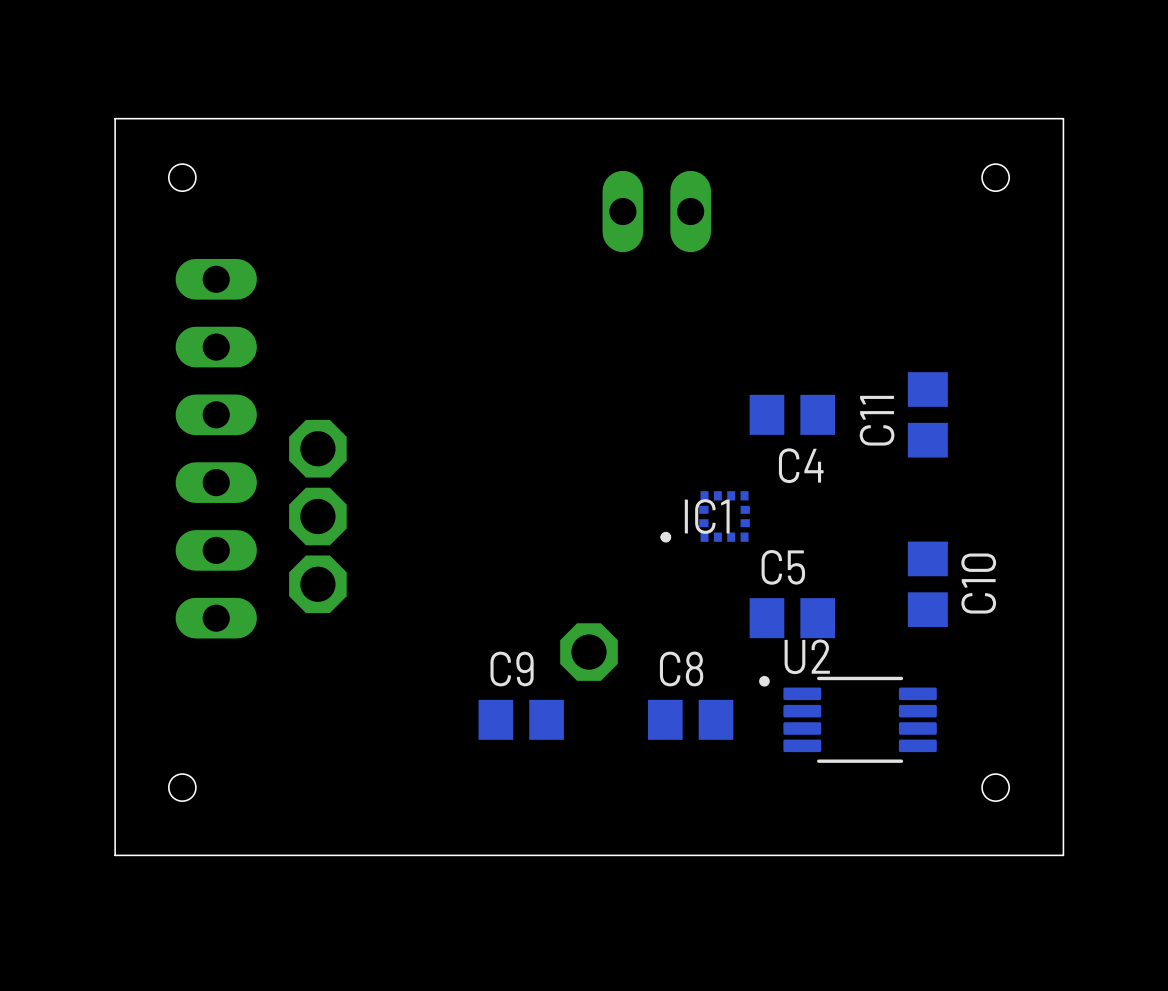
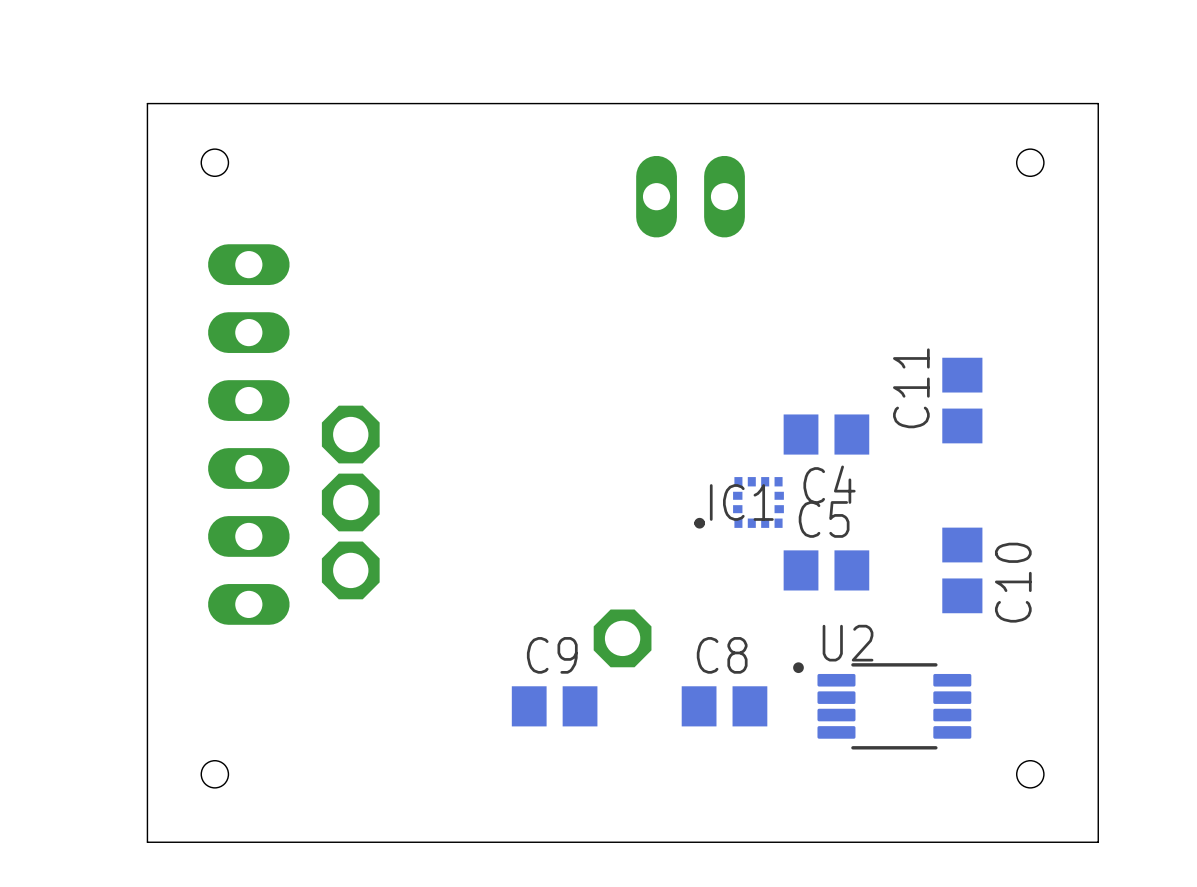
C4 position: (792, 414) -> (826, 434)
C5 position: (792, 618) -> (826, 570)

